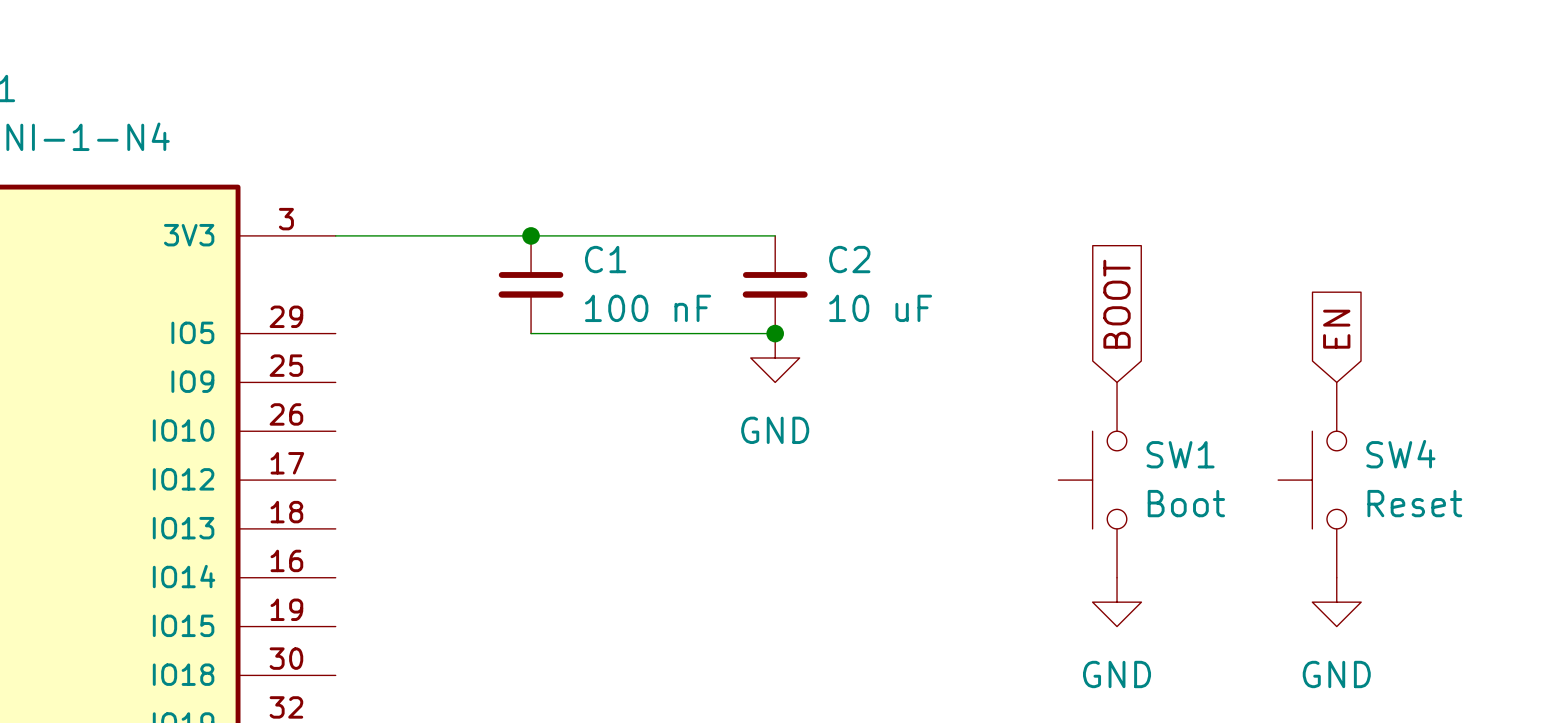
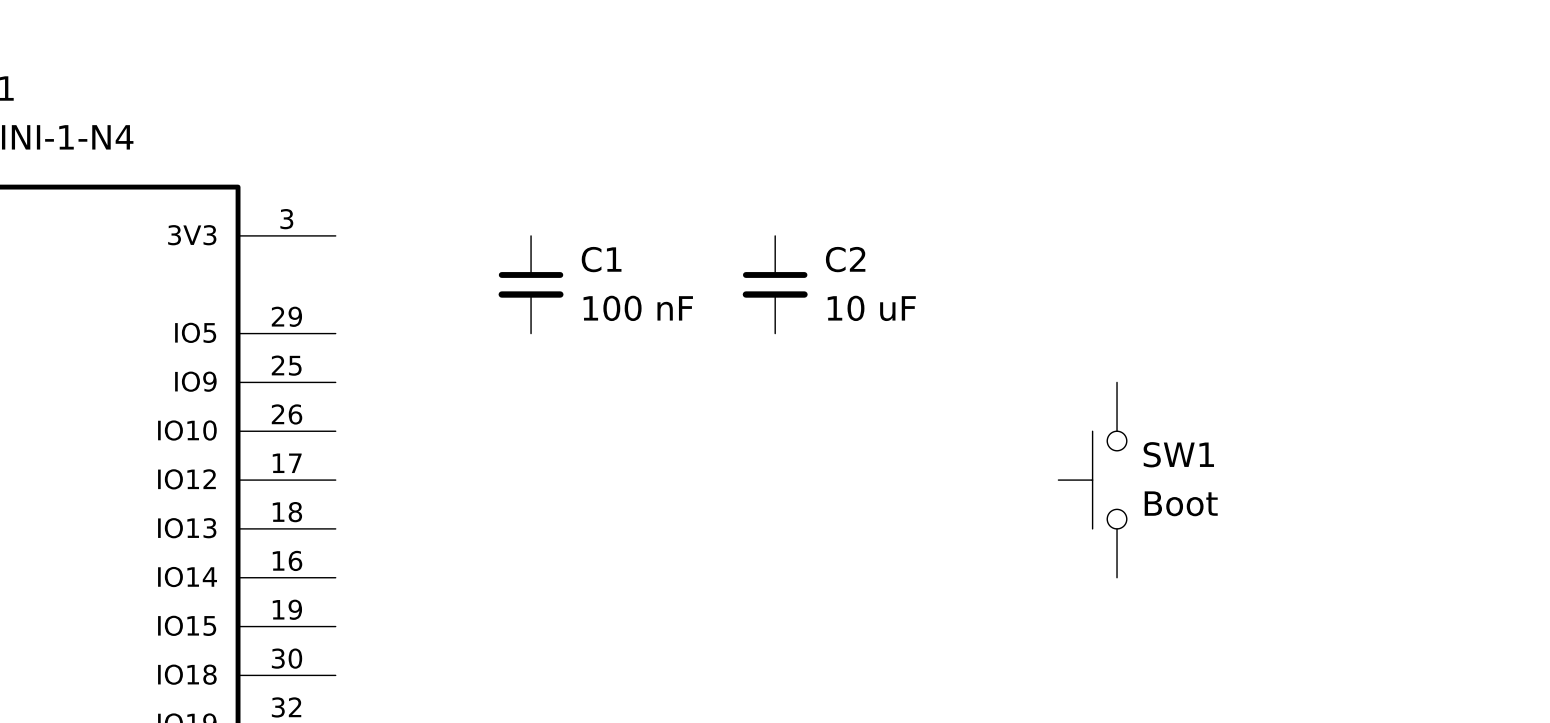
wire: (335, 235) (775, 235) -> none
junction: (531, 235) -> none
global label: BOOT (1117, 304) -> none
global label: EN (1336, 329) -> none
wire: (531, 333) (775, 333) -> none
junction: (775, 333) -> none
power symbol: GND (775, 358) -> none
SW4: Reset (1312, 480) -> none
power symbol: GND (1117, 602) -> none
power symbol: GND (1336, 602) -> none

